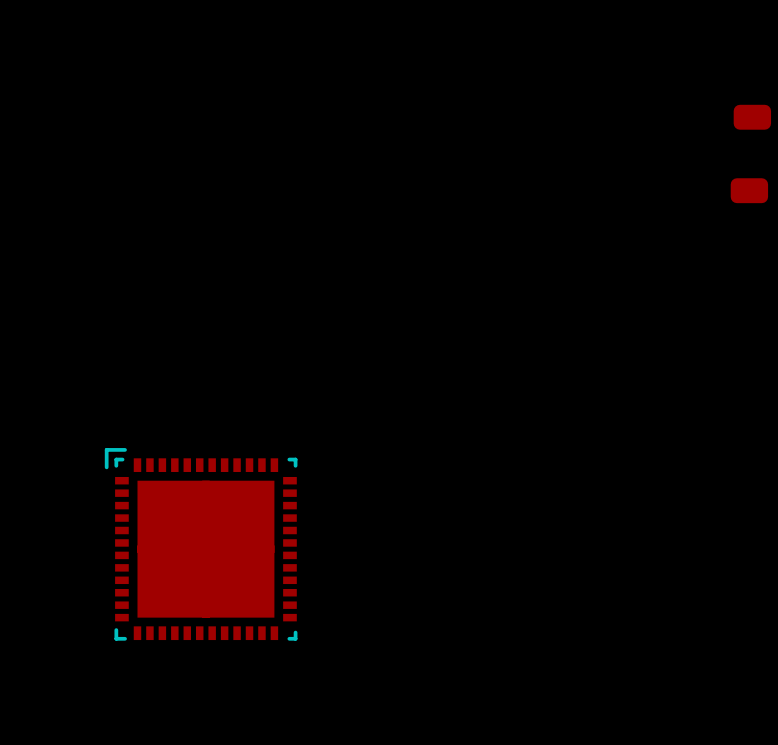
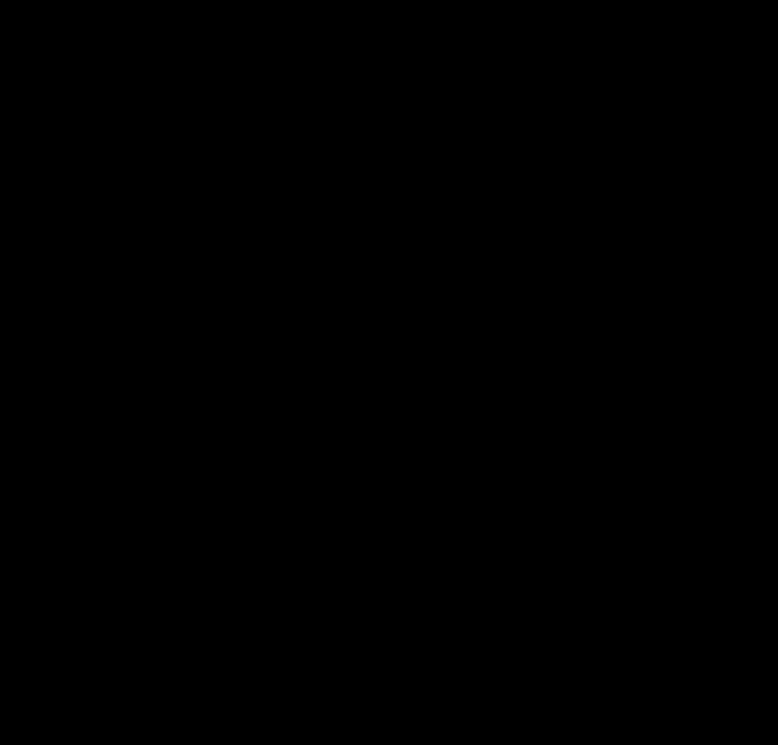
part: (752, 117) -> none
part: (749, 190) -> none
part: (201, 544) -> none

